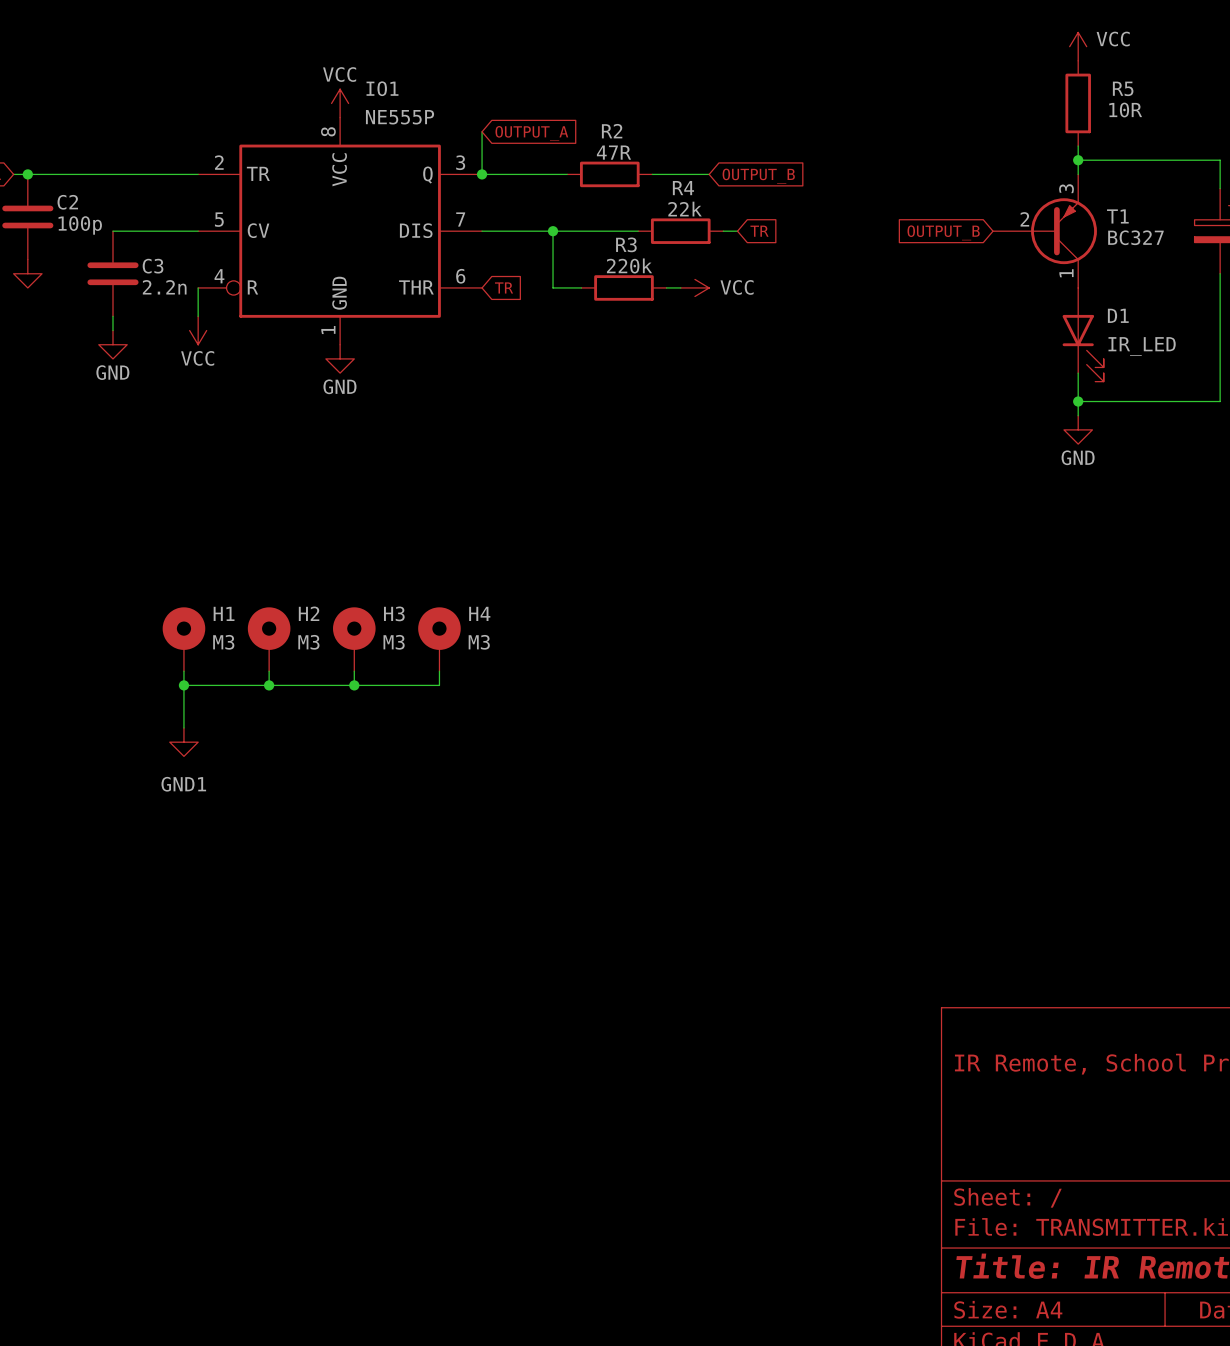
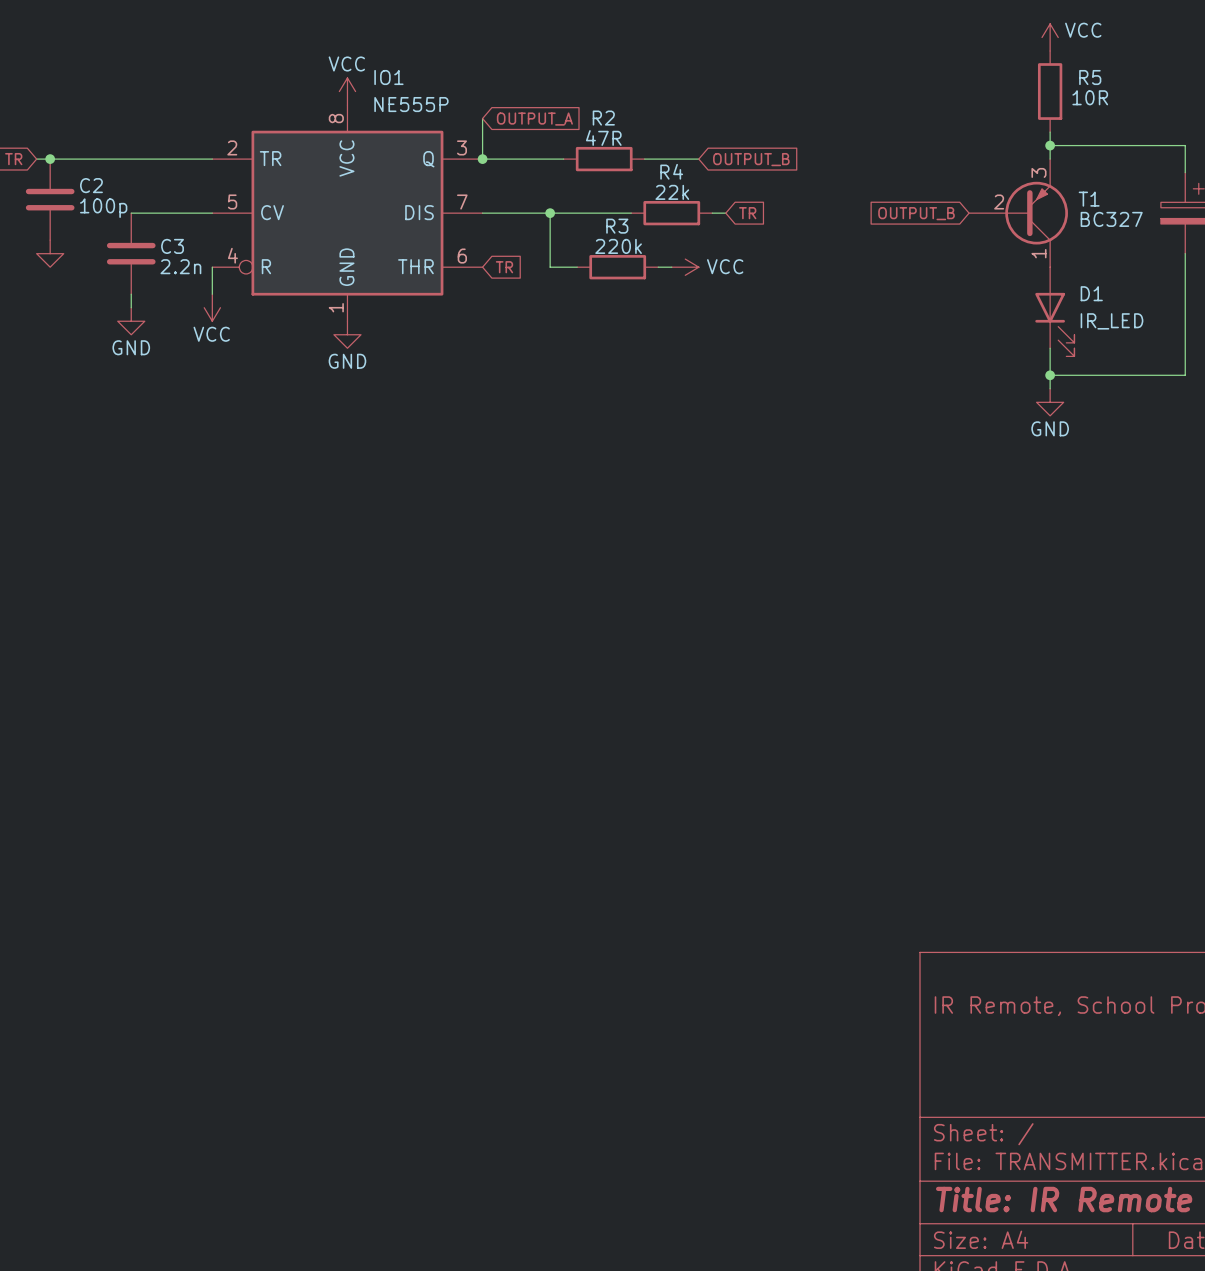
H1: M3 (183, 639) -> none
H2: M3 (269, 639) -> none
H3: M3 (354, 639) -> none
H4: M3 (439, 639) -> none
wire: (183, 671) (183, 727) -> none
wire: (269, 671) (269, 685) -> none
wire: (354, 671) (354, 685) -> none
wire: (439, 671) (439, 685) (183, 685) -> none
junction: (183, 685) -> none
junction: (269, 685) -> none
junction: (354, 685) -> none
power symbol: GND1 (183, 742) -> none

